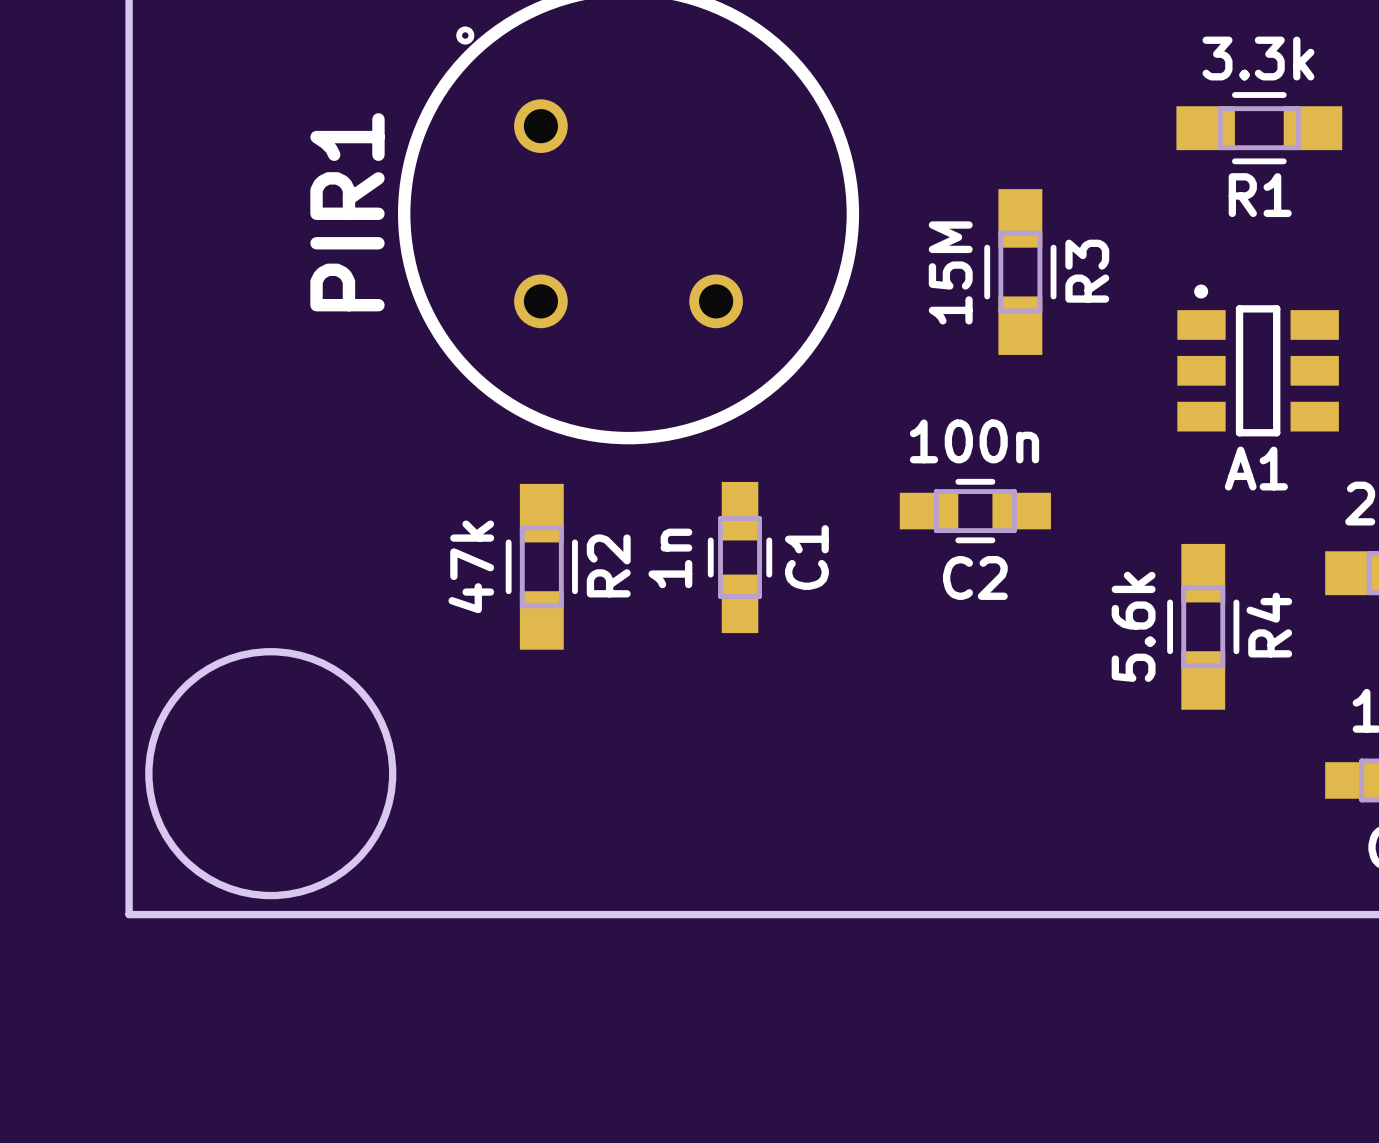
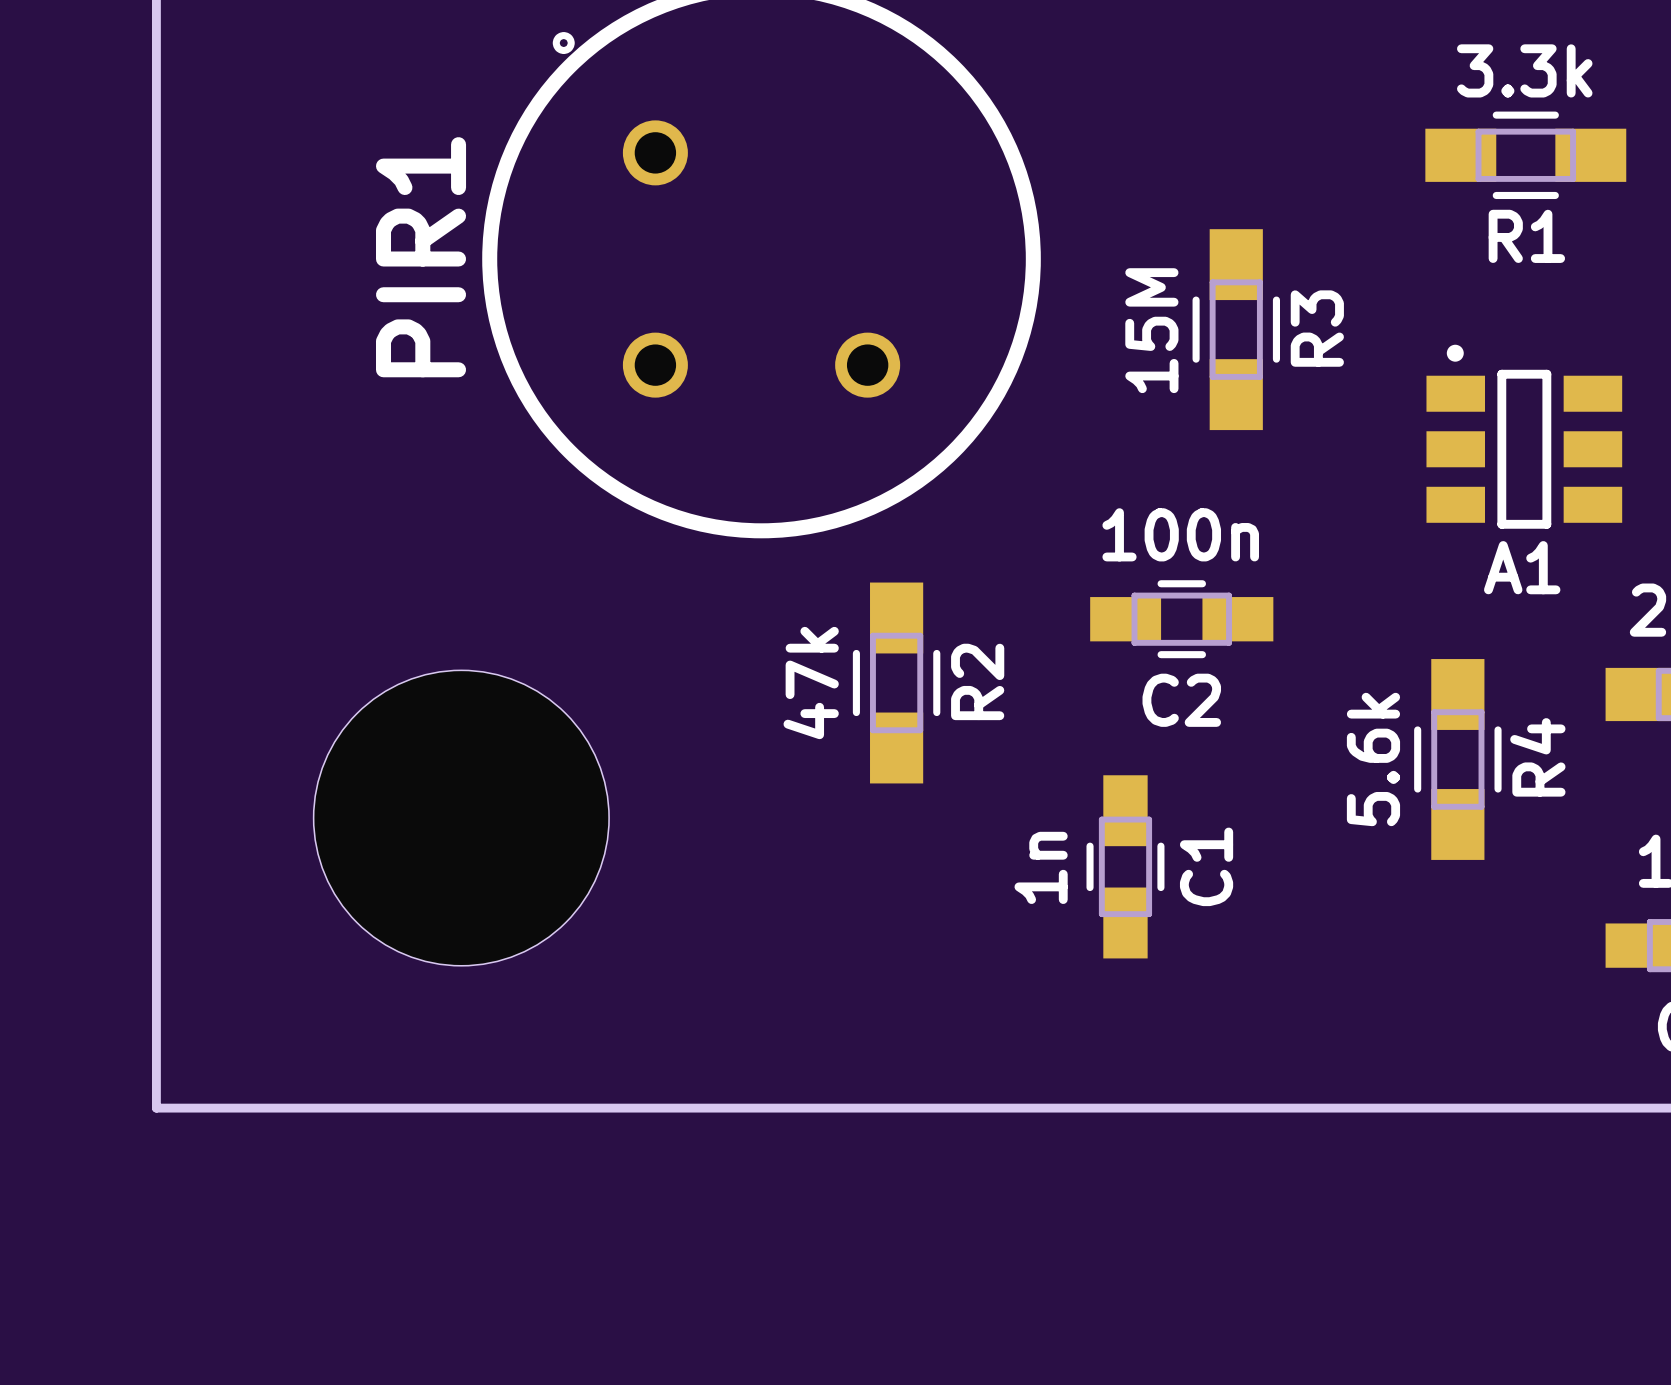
C1 position: (740, 557) -> (1125, 866)
R2 position: (541, 566) -> (896, 682)
round board edge: [145, 648, 397, 900] -> none
part: none -> (461, 818)

